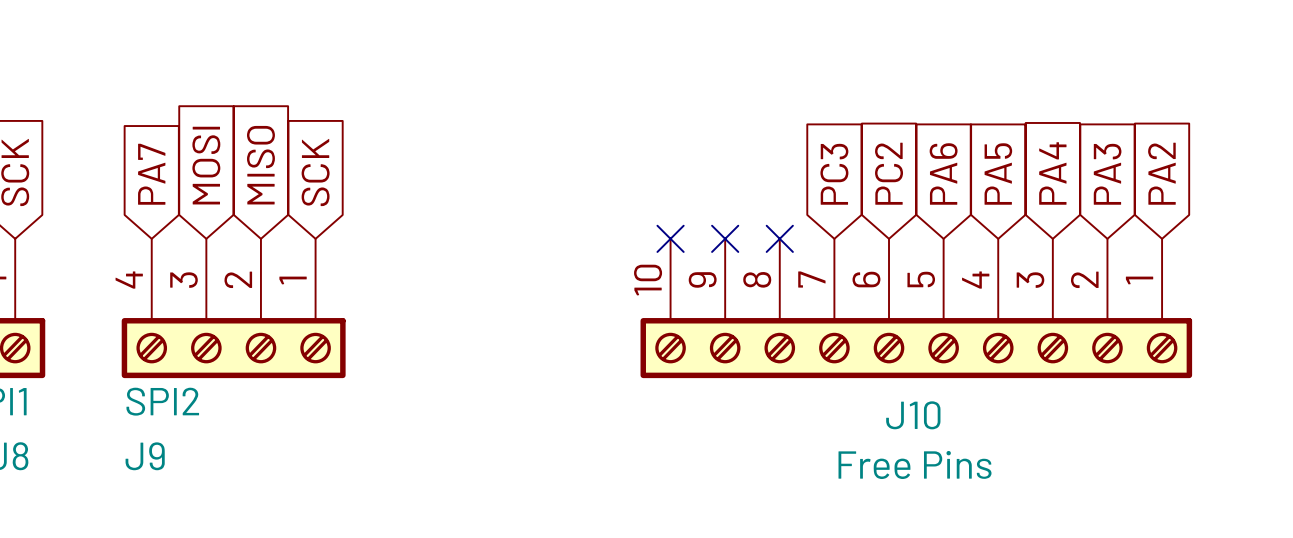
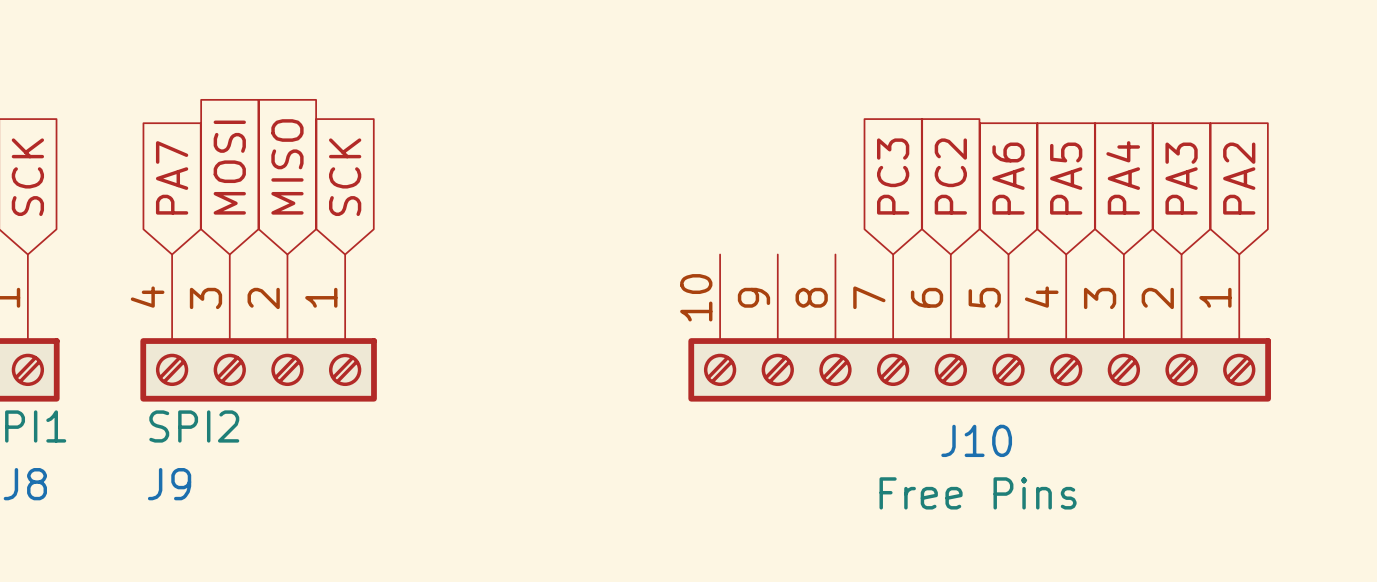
no-connect mark: (670, 238) -> none
no-connect mark: (725, 238) -> none
no-connect mark: (779, 238) -> none

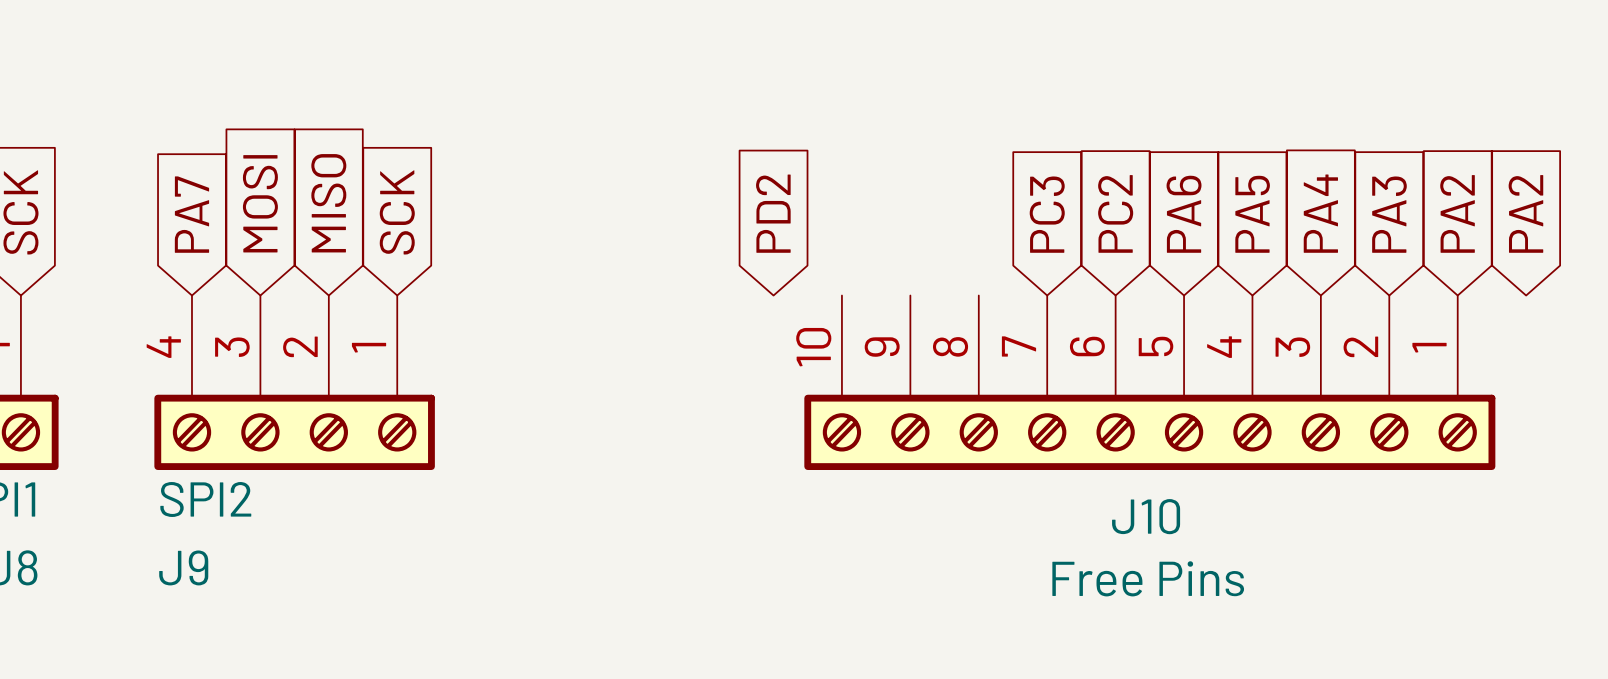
global label: none -> PD2 (773, 213)
global label: none -> PA2 (1525, 213)

